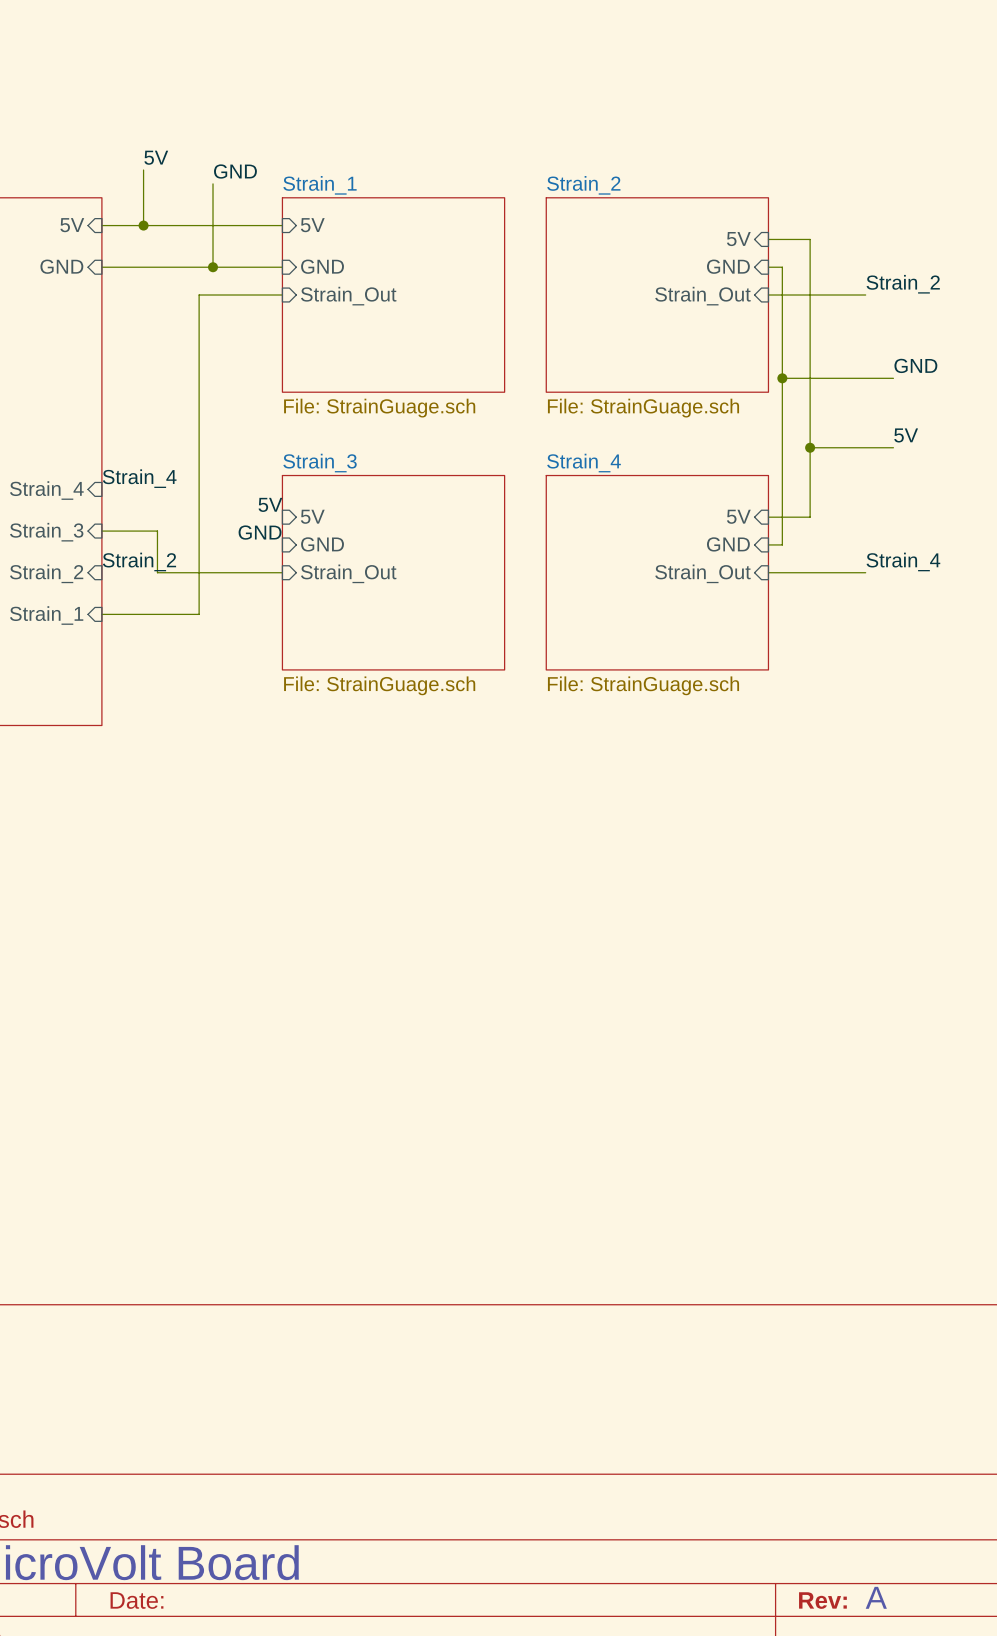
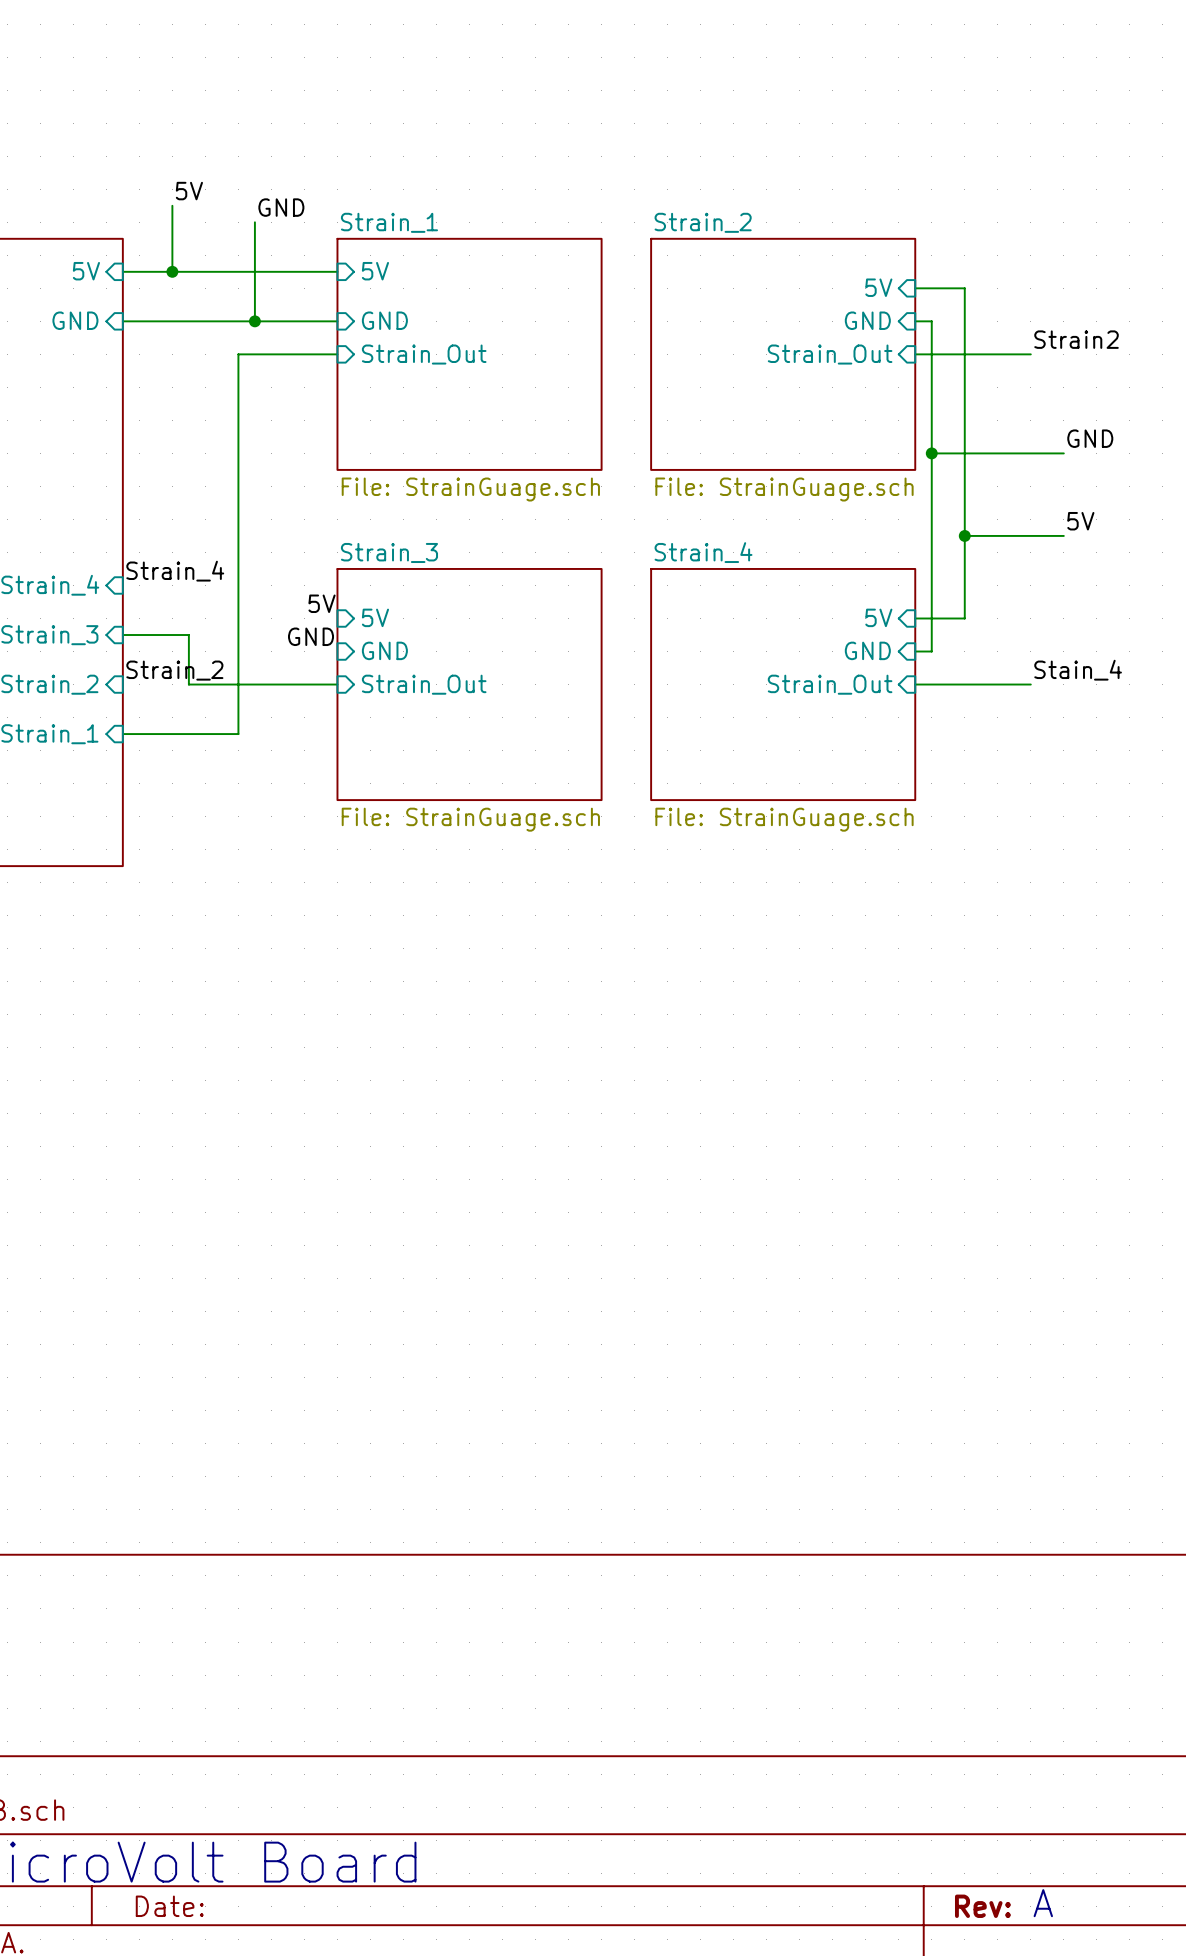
label: Strain_2 (903, 284) -> Strain2 (1076, 339)
label: Strain_4 (903, 561) -> Stain_4 (1078, 670)

